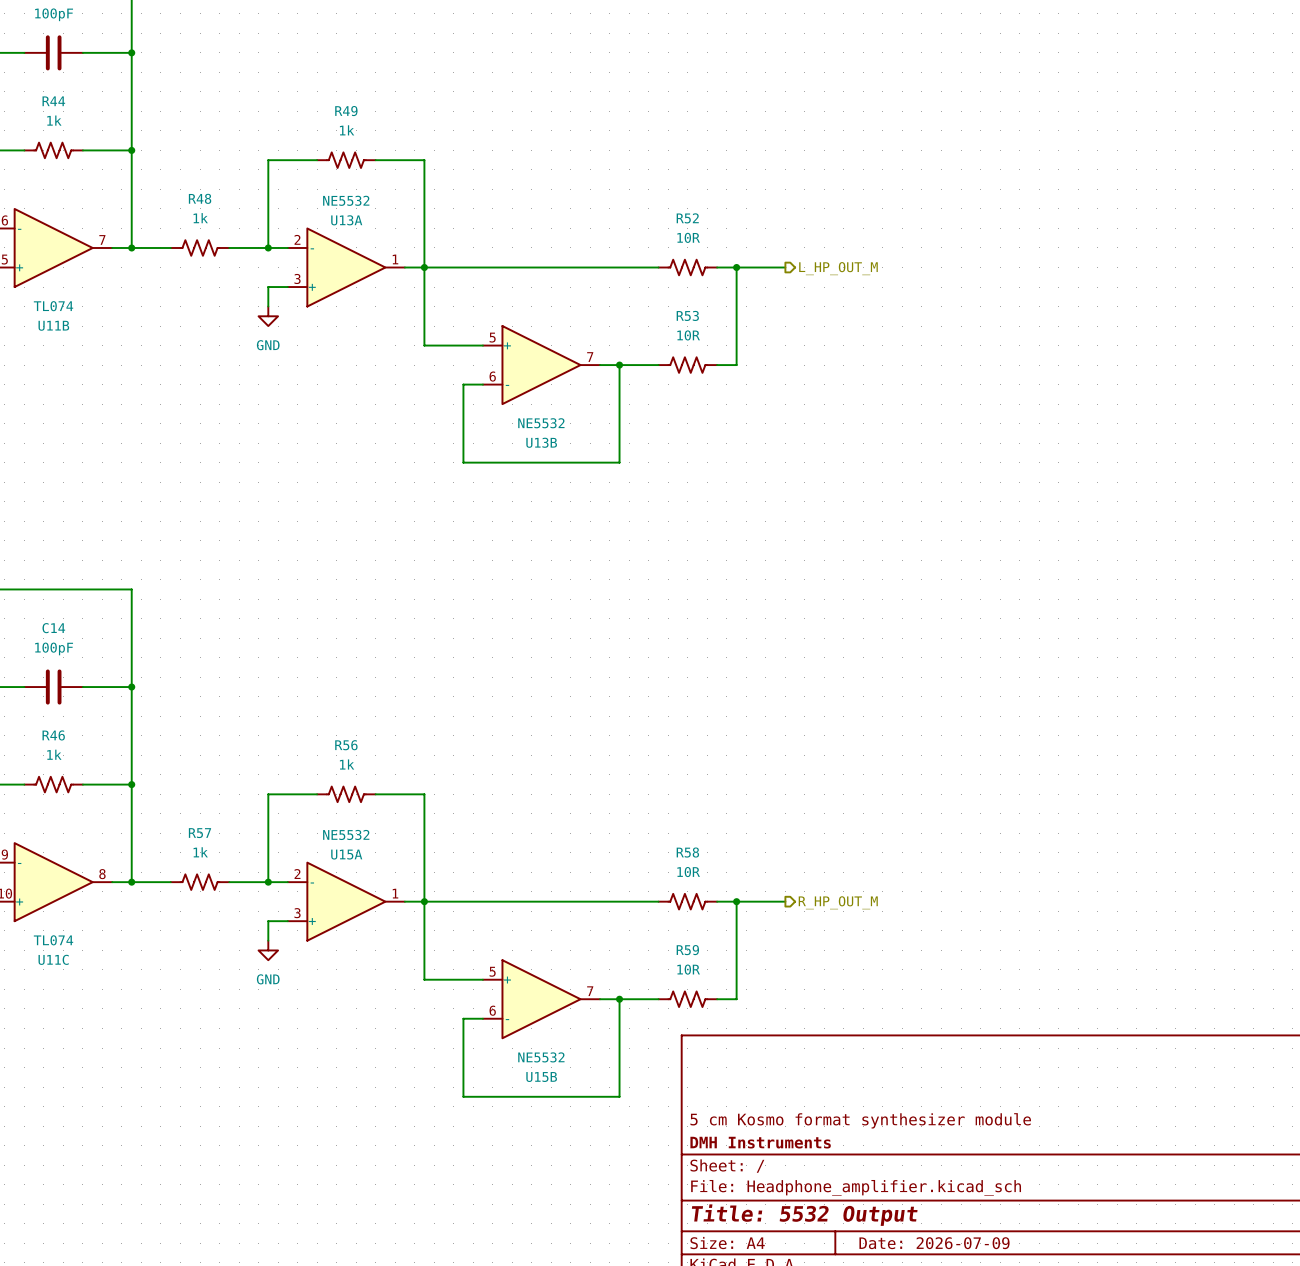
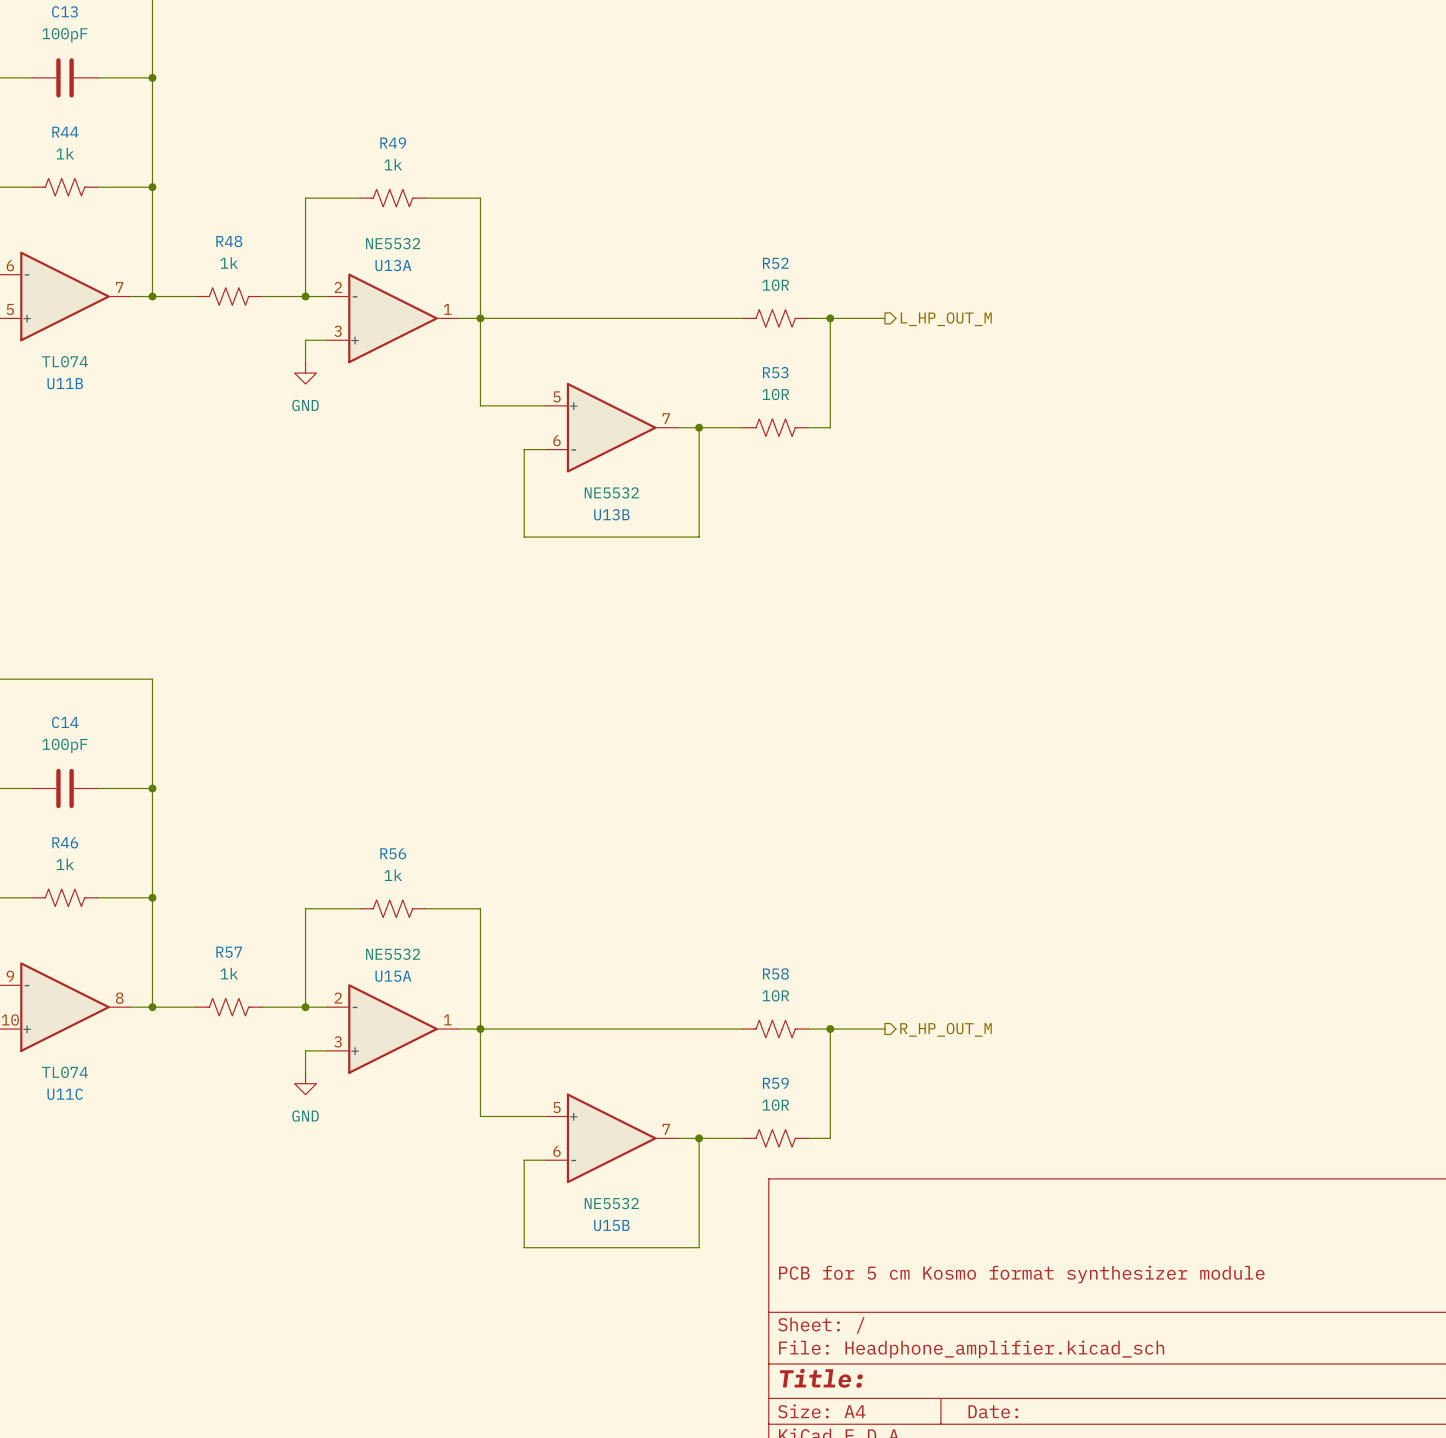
title block: 5 cm Kosmo format synthesizer module (860, 1120) -> PCB for 5 cm Kosmo format synthesizer module (1021, 1274)
title block: DMH Instruments (760, 1142) -> none
title block: Title: 5532 Output (804, 1215) -> Title: (821, 1378)
title block: Date: 2026-07-09 (934, 1243) -> Date: (993, 1411)

